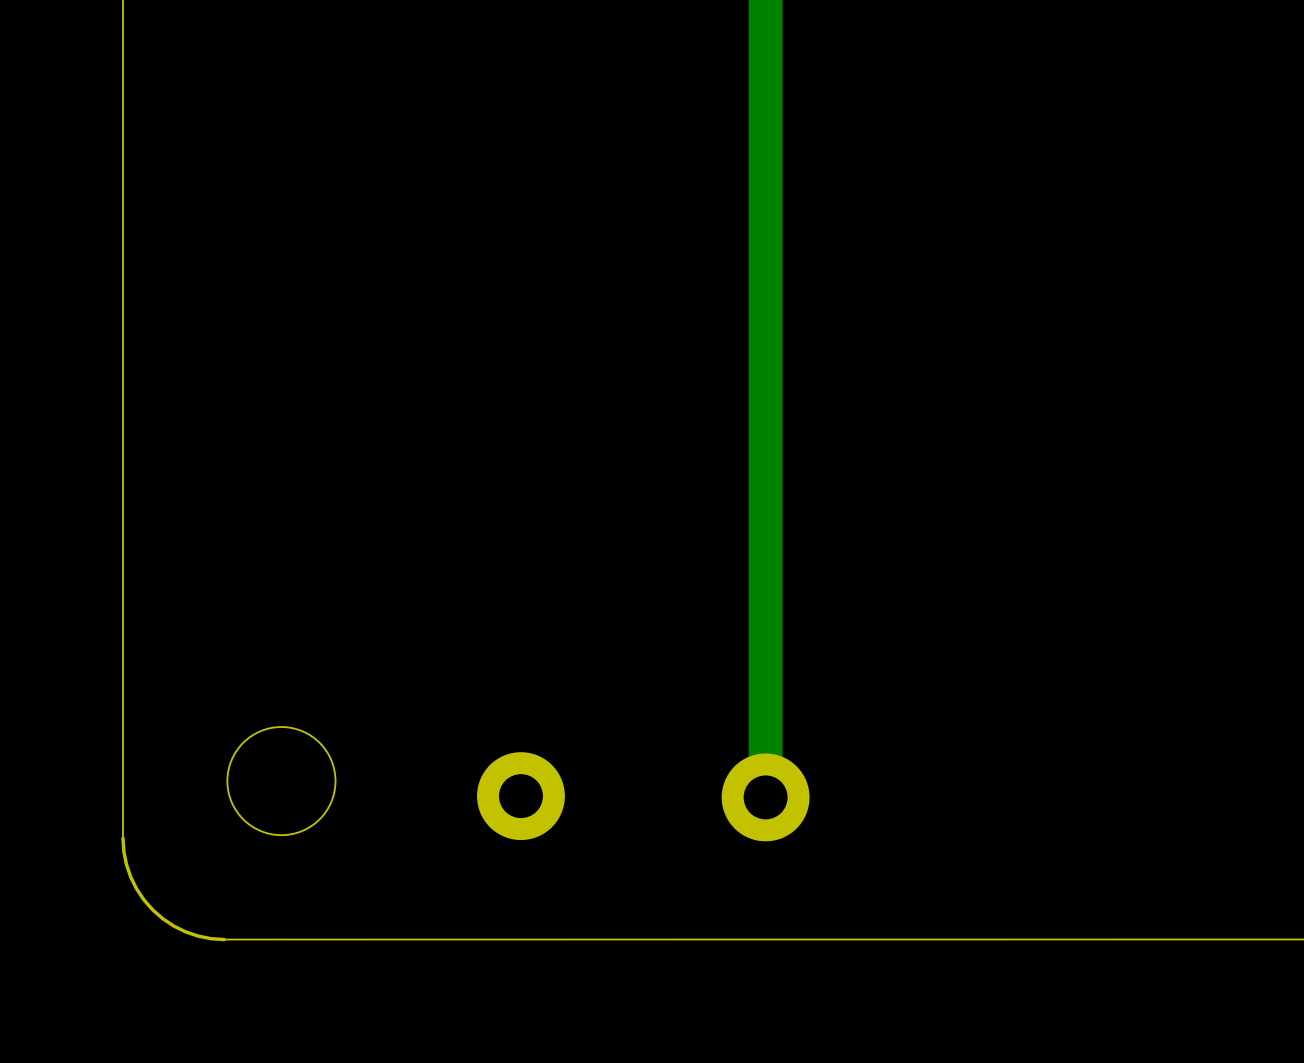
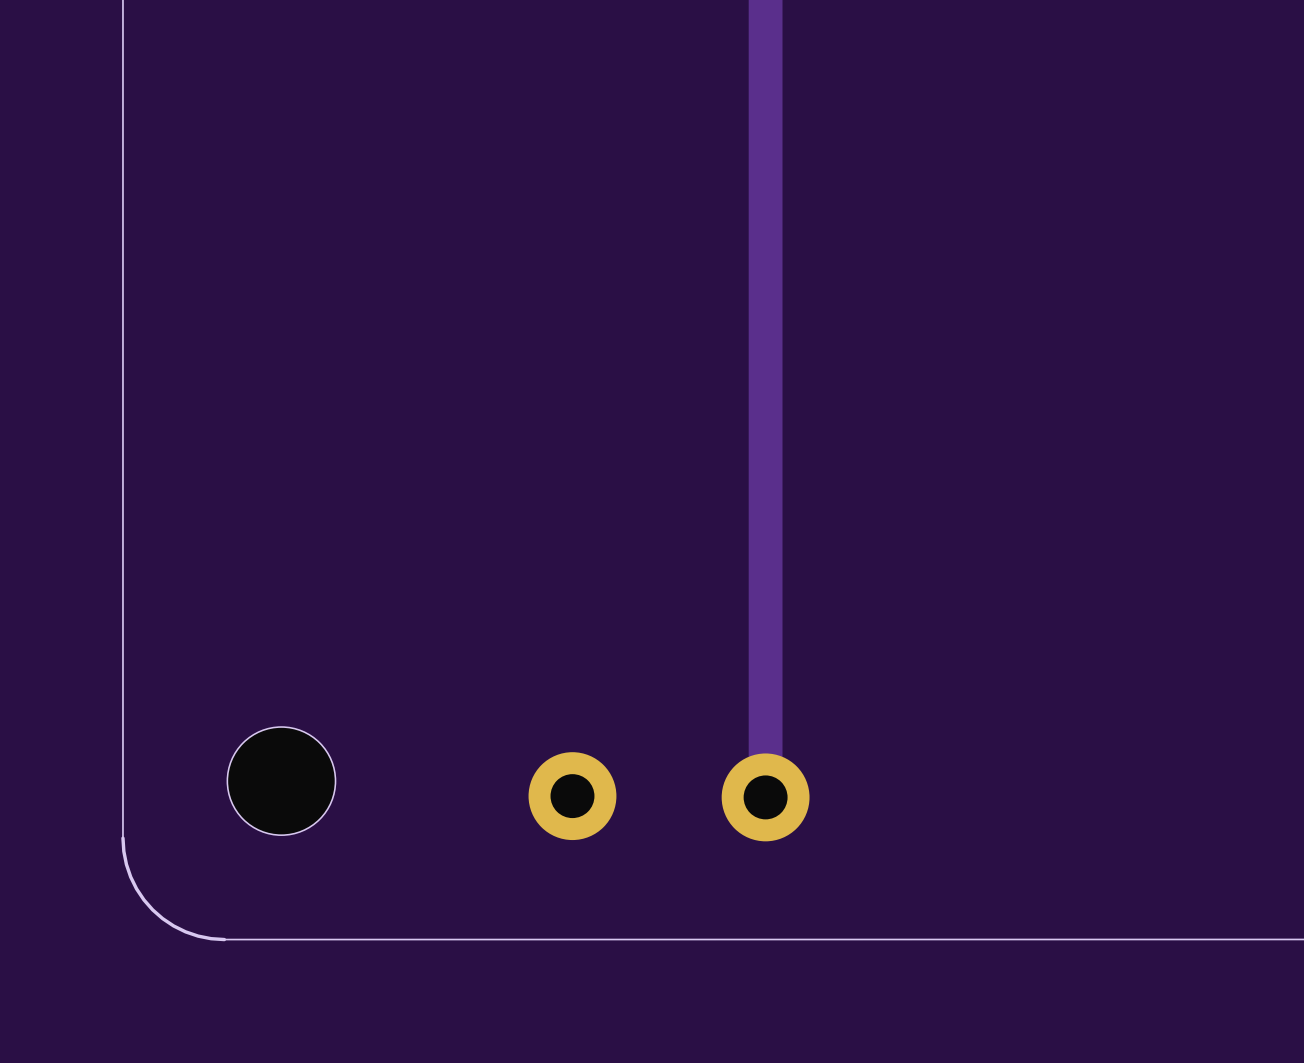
part position: (520, 796) -> (572, 796)

